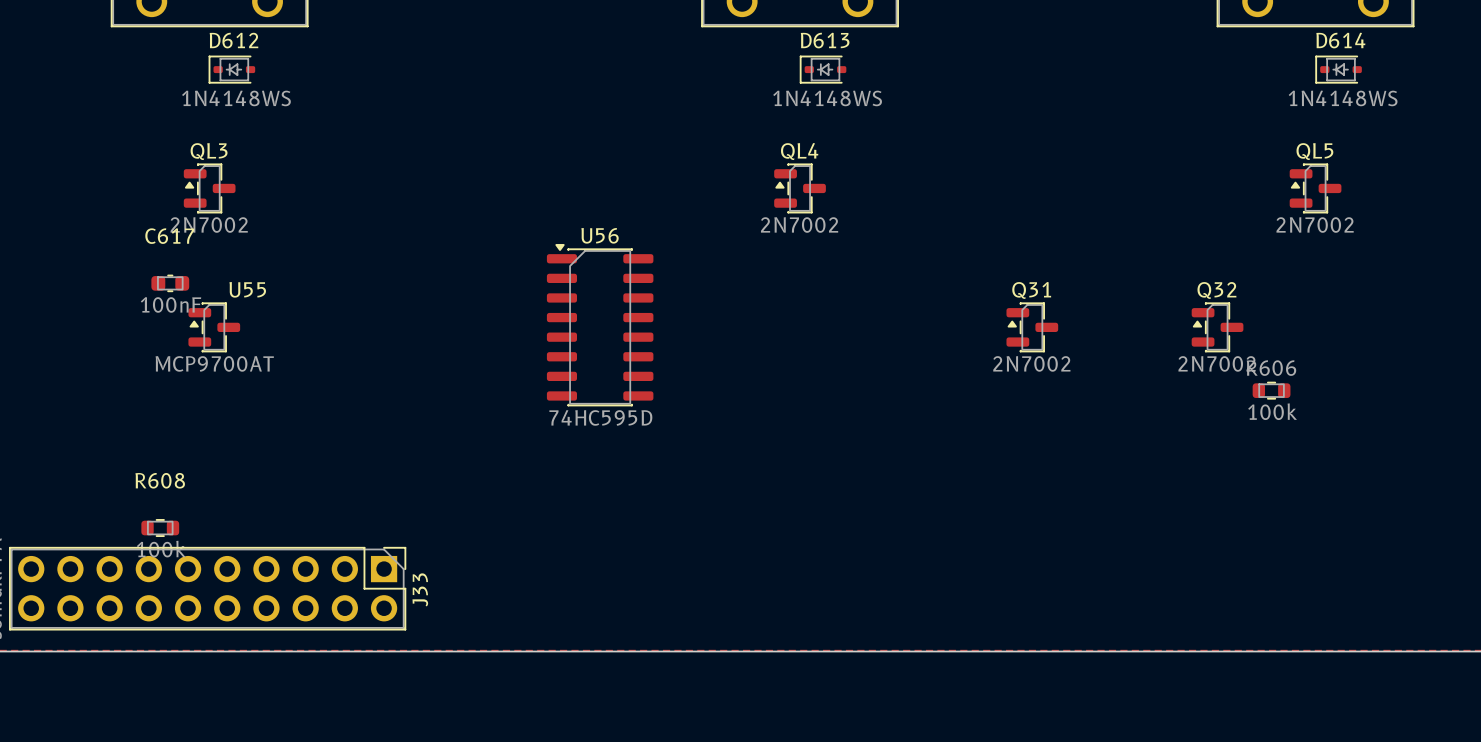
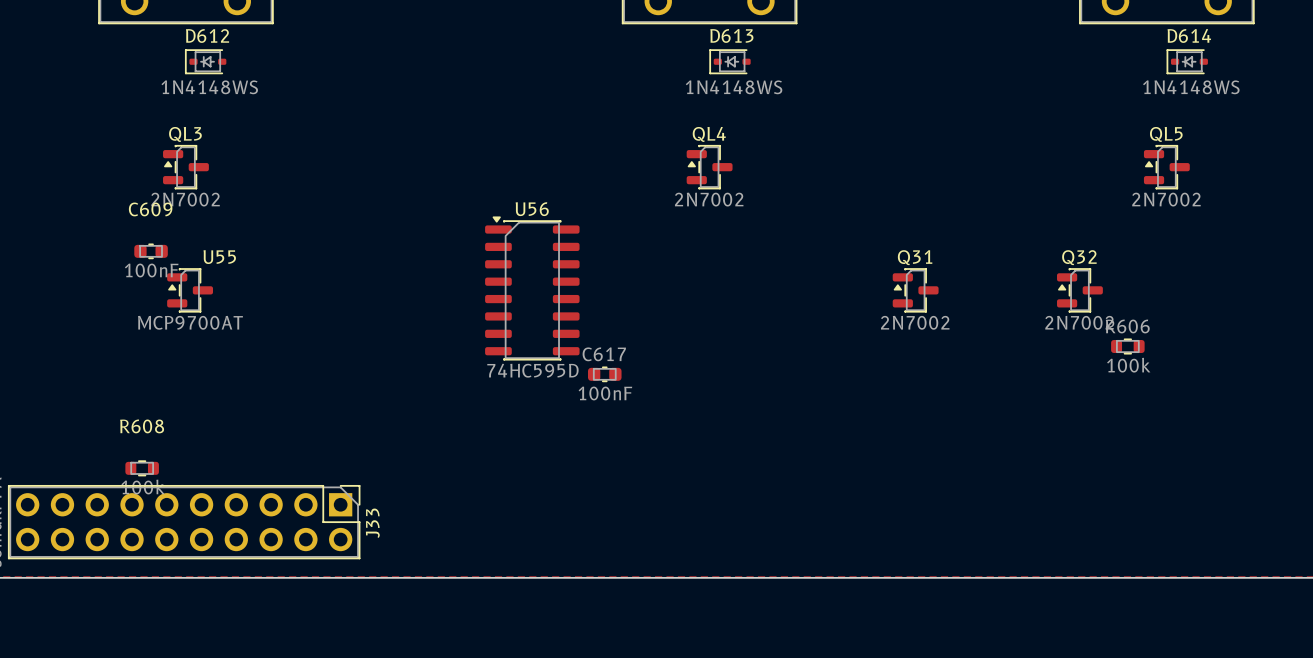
C617 name: C617 (169, 236) -> C609 (150, 209)
C617: none -> 100nF (604, 374)

